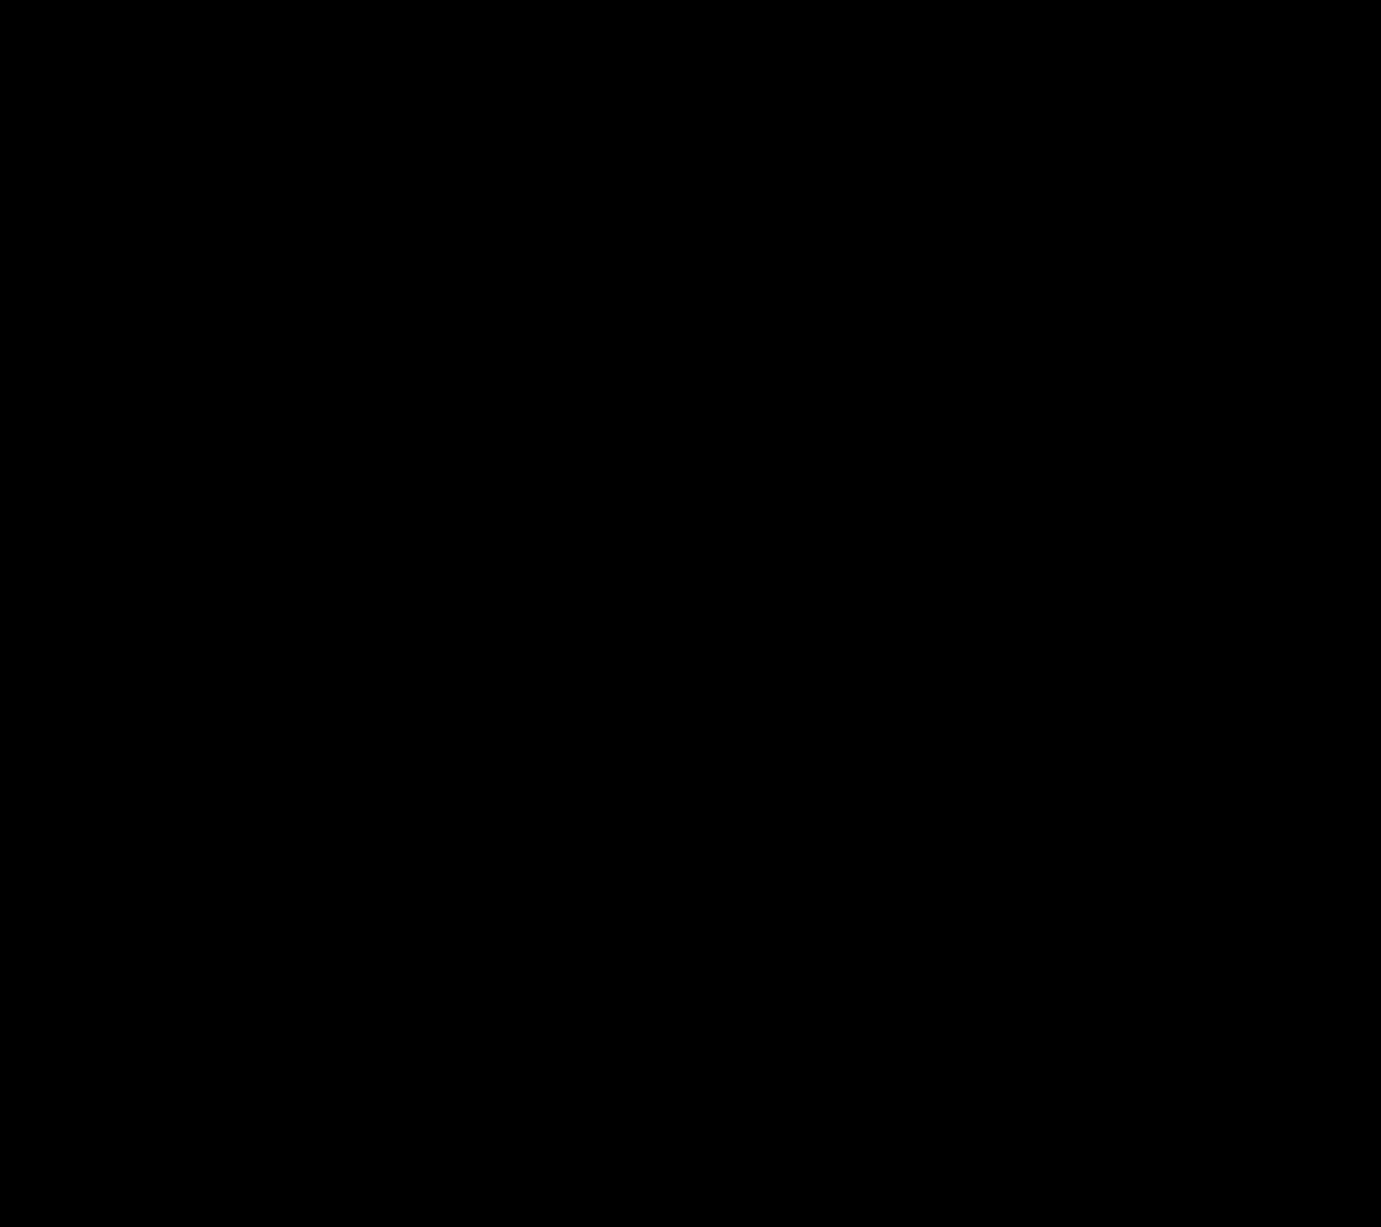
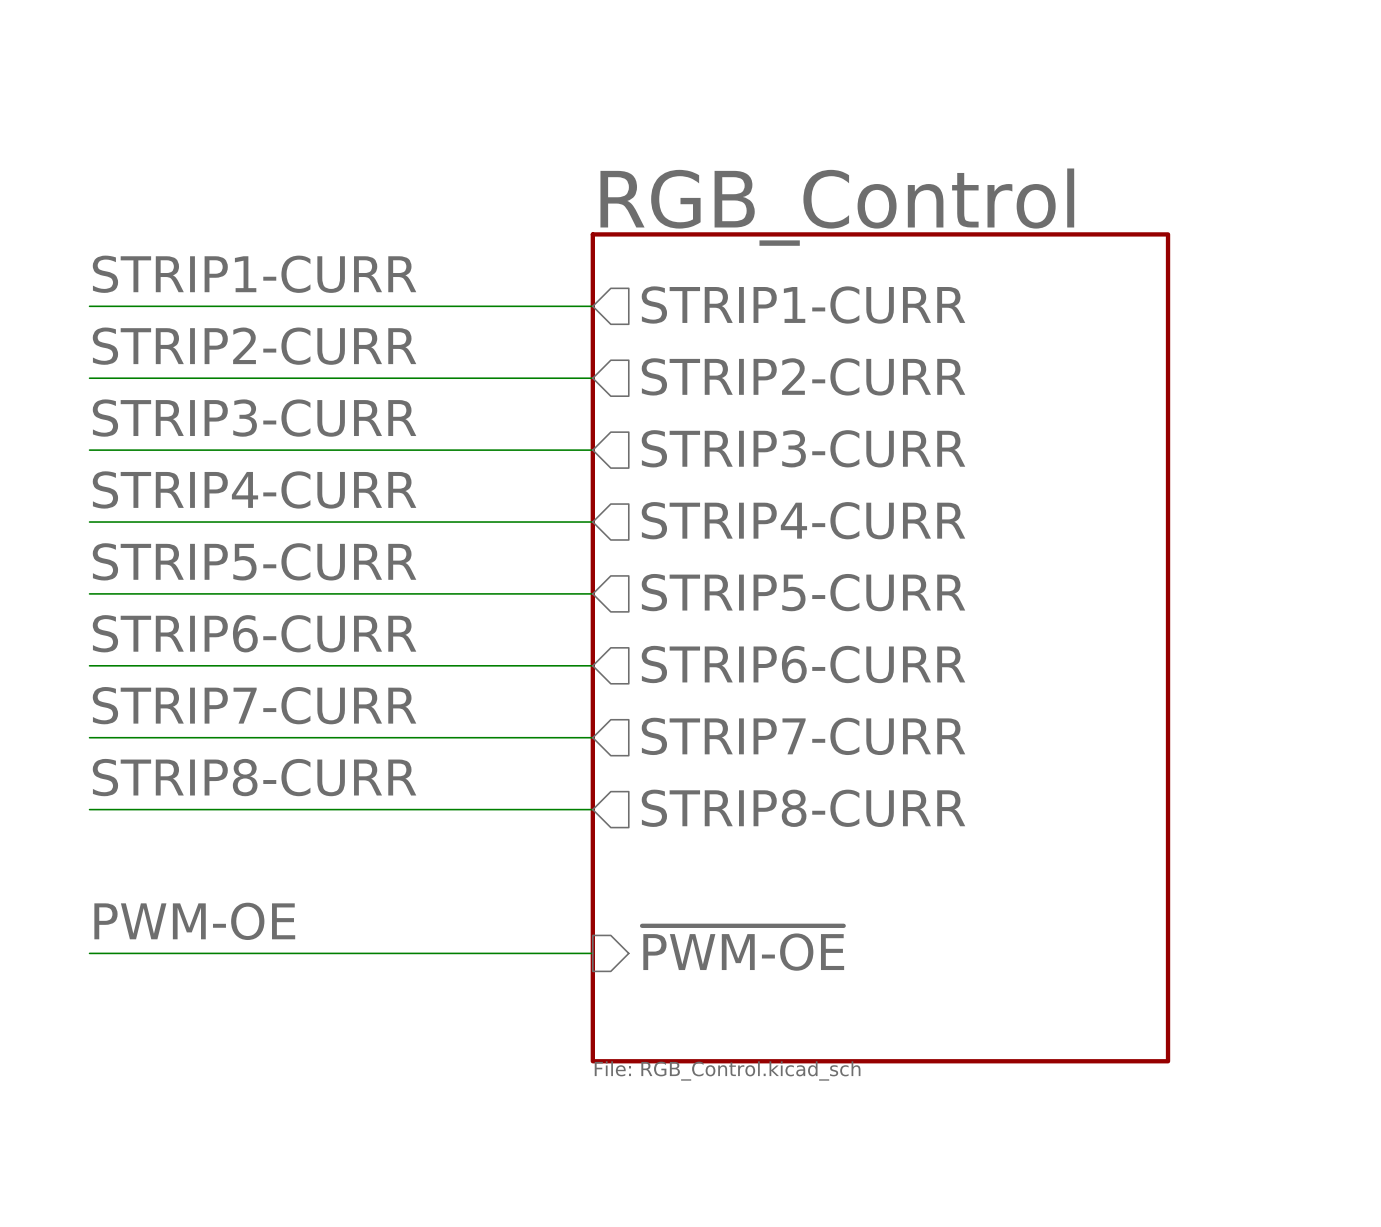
label: none -> STRIP1-CURR (254, 274)
sheet pin: none -> STRIP1-CURR (803, 305)
wire: none -> (89, 306) (592, 306)
label: none -> STRIP2-CURR (254, 346)
sheet pin: none -> STRIP2-CURR (803, 376)
wire: none -> (89, 378) (592, 378)
label: none -> STRIP3-CURR (254, 418)
sheet pin: none -> STRIP3-CURR (803, 448)
wire: none -> (89, 450) (592, 450)
label: none -> STRIP4-CURR (254, 489)
sheet pin: none -> STRIP4-CURR (803, 520)
wire: none -> (89, 522) (592, 522)
label: none -> STRIP5-CURR (254, 561)
sheet pin: none -> STRIP5-CURR (803, 592)
wire: none -> (89, 593) (592, 593)
label: none -> STRIP6-CURR (254, 633)
sheet RGB_Control: none -> File: RGB_Control.kicad_sch (880, 647)
sheet pin: none -> STRIP6-CURR (803, 664)
wire: none -> (89, 665) (592, 665)
label: none -> STRIP7-CURR (254, 705)
sheet pin: none -> STRIP7-CURR (803, 736)
wire: none -> (89, 737) (592, 737)
label: none -> STRIP8-CURR (254, 777)
sheet pin: none -> STRIP8-CURR (803, 808)
wire: none -> (89, 809) (592, 809)
label: none -> PWM-OE (194, 921)
sheet pin: none -> ~{PWM-OE} (743, 948)
wire: none -> (89, 953) (592, 953)

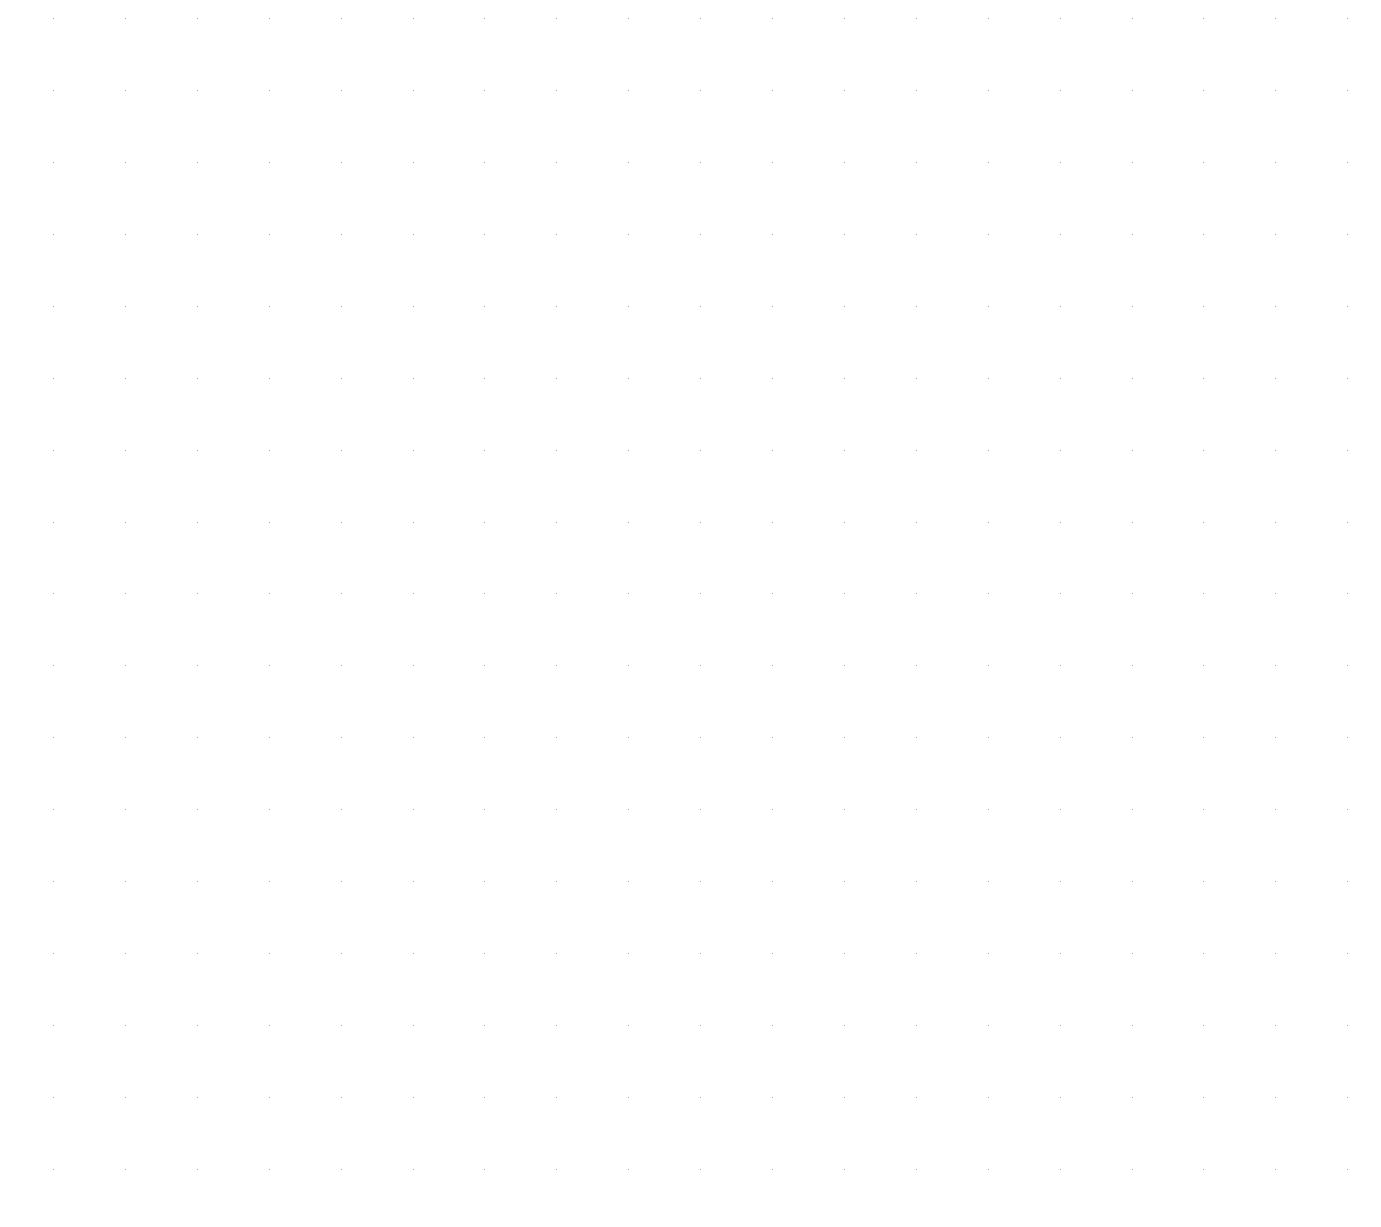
label: STRIP1-CURR (254, 274) -> none
sheet pin: STRIP1-CURR (803, 305) -> none
wire: (89, 306) (592, 306) -> none
label: STRIP2-CURR (254, 346) -> none
sheet pin: STRIP2-CURR (803, 376) -> none
wire: (89, 378) (592, 378) -> none
label: STRIP3-CURR (254, 418) -> none
sheet pin: STRIP3-CURR (803, 448) -> none
wire: (89, 450) (592, 450) -> none
label: STRIP4-CURR (254, 489) -> none
sheet pin: STRIP4-CURR (803, 520) -> none
wire: (89, 522) (592, 522) -> none
label: STRIP5-CURR (254, 561) -> none
sheet pin: STRIP5-CURR (803, 592) -> none
wire: (89, 593) (592, 593) -> none
label: STRIP6-CURR (254, 633) -> none
sheet RGB_Control: File: RGB_Control.kicad_sch (880, 647) -> none
sheet pin: STRIP6-CURR (803, 664) -> none
wire: (89, 665) (592, 665) -> none
label: STRIP7-CURR (254, 705) -> none
sheet pin: STRIP7-CURR (803, 736) -> none
wire: (89, 737) (592, 737) -> none
label: STRIP8-CURR (254, 777) -> none
sheet pin: STRIP8-CURR (803, 808) -> none
wire: (89, 809) (592, 809) -> none
label: PWM-OE (194, 921) -> none
sheet pin: ~{PWM-OE} (743, 948) -> none
wire: (89, 953) (592, 953) -> none

